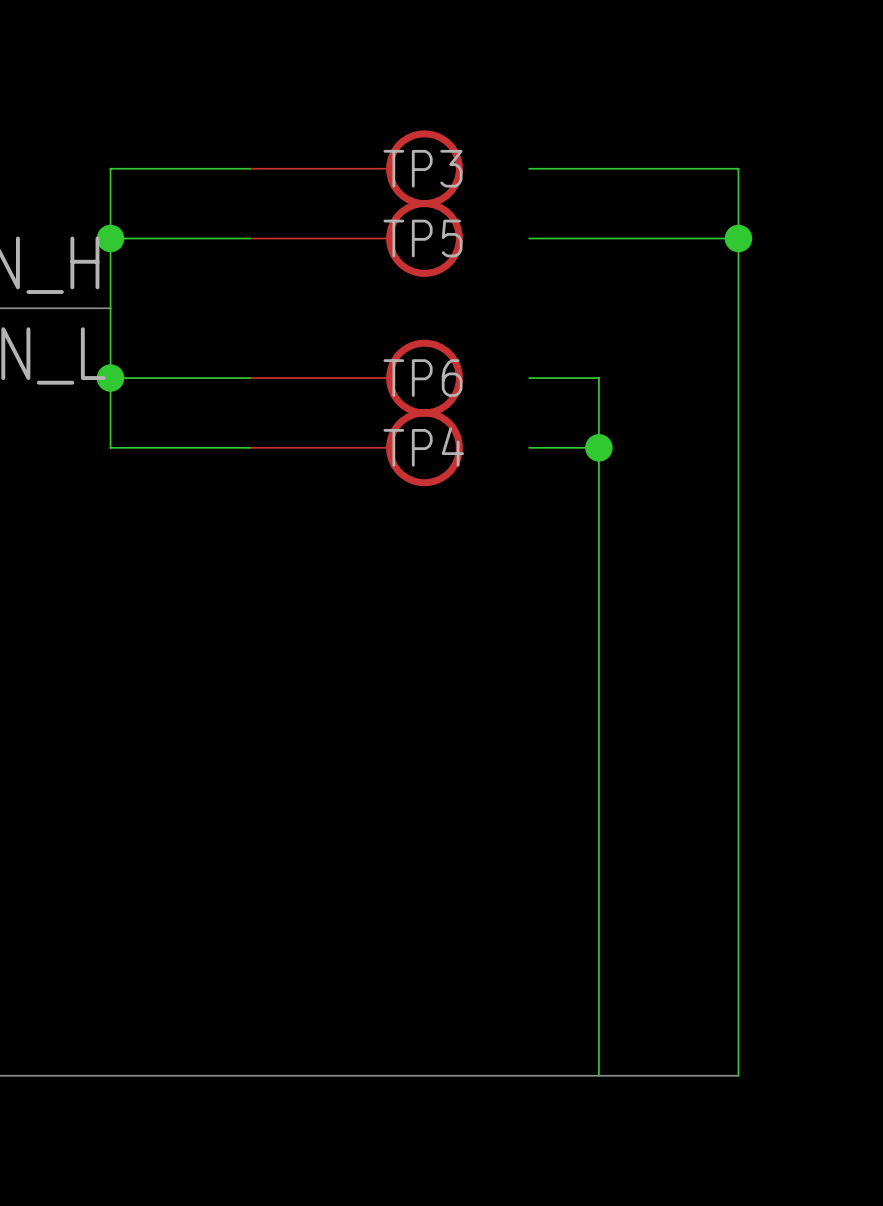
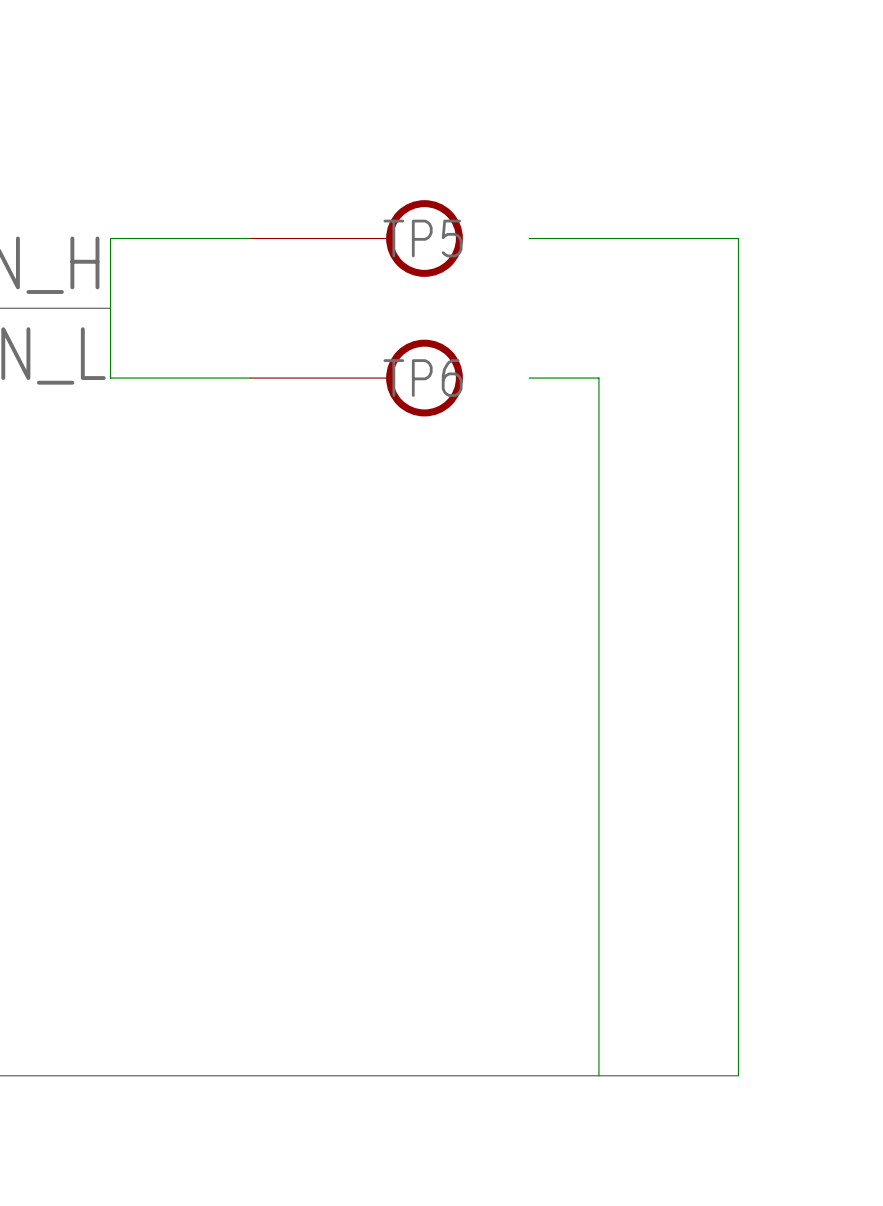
wire: (250, 168) (110, 168) (110, 238) -> none
TP3: (356, 168) -> none
wire: (529, 168) (738, 168) (738, 238) -> none
junction: (110, 238) -> none
junction: (738, 238) -> none
wire: (110, 378) (110, 447) (250, 447) -> none
junction: (110, 378) -> none
TP4: (356, 447) -> none
wire: (529, 447) (598, 447) -> none
junction: (598, 447) -> none

